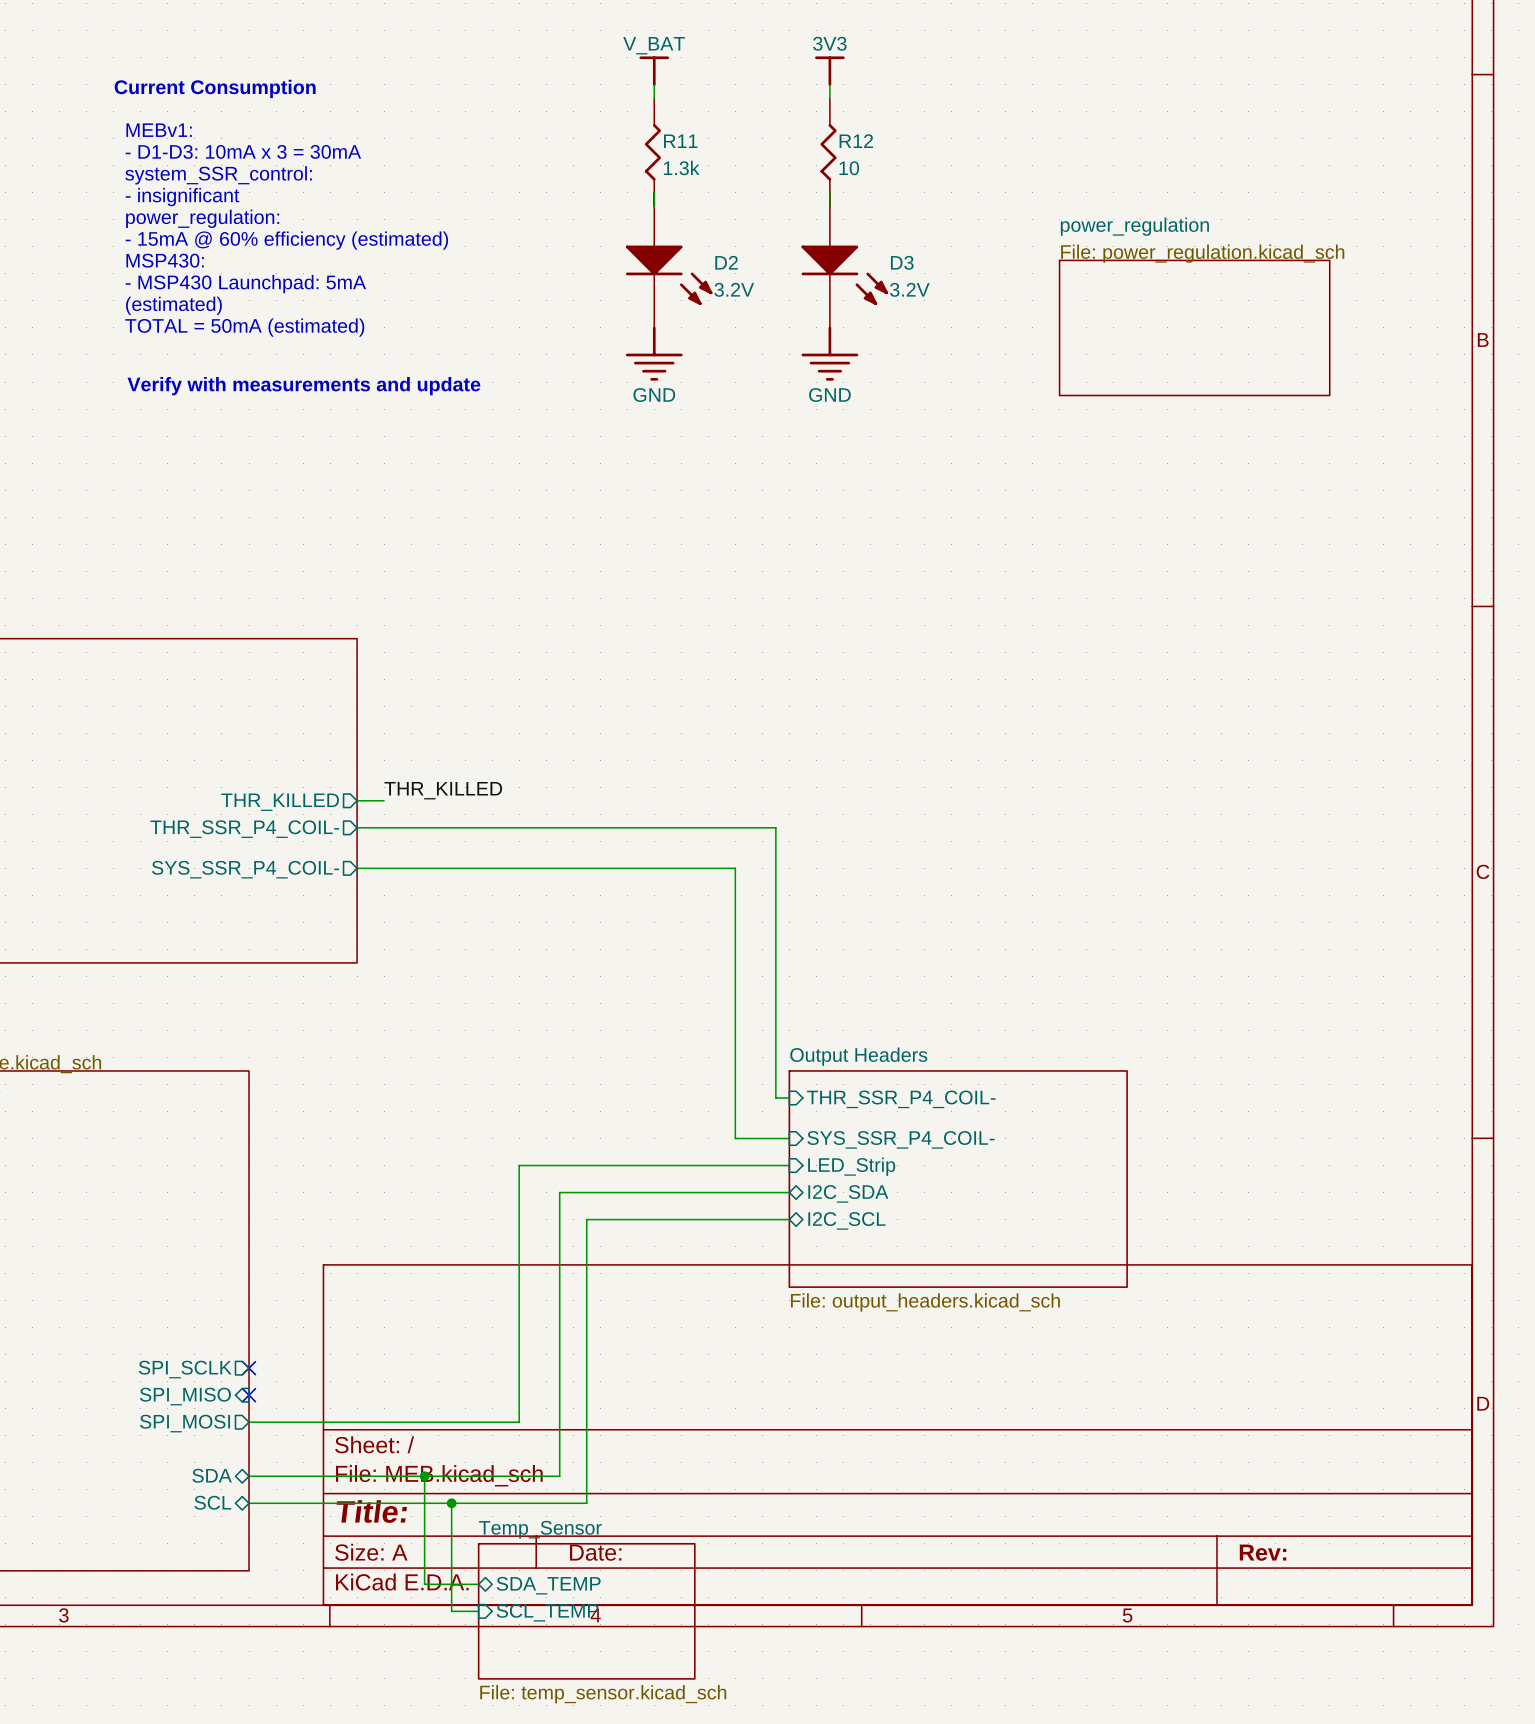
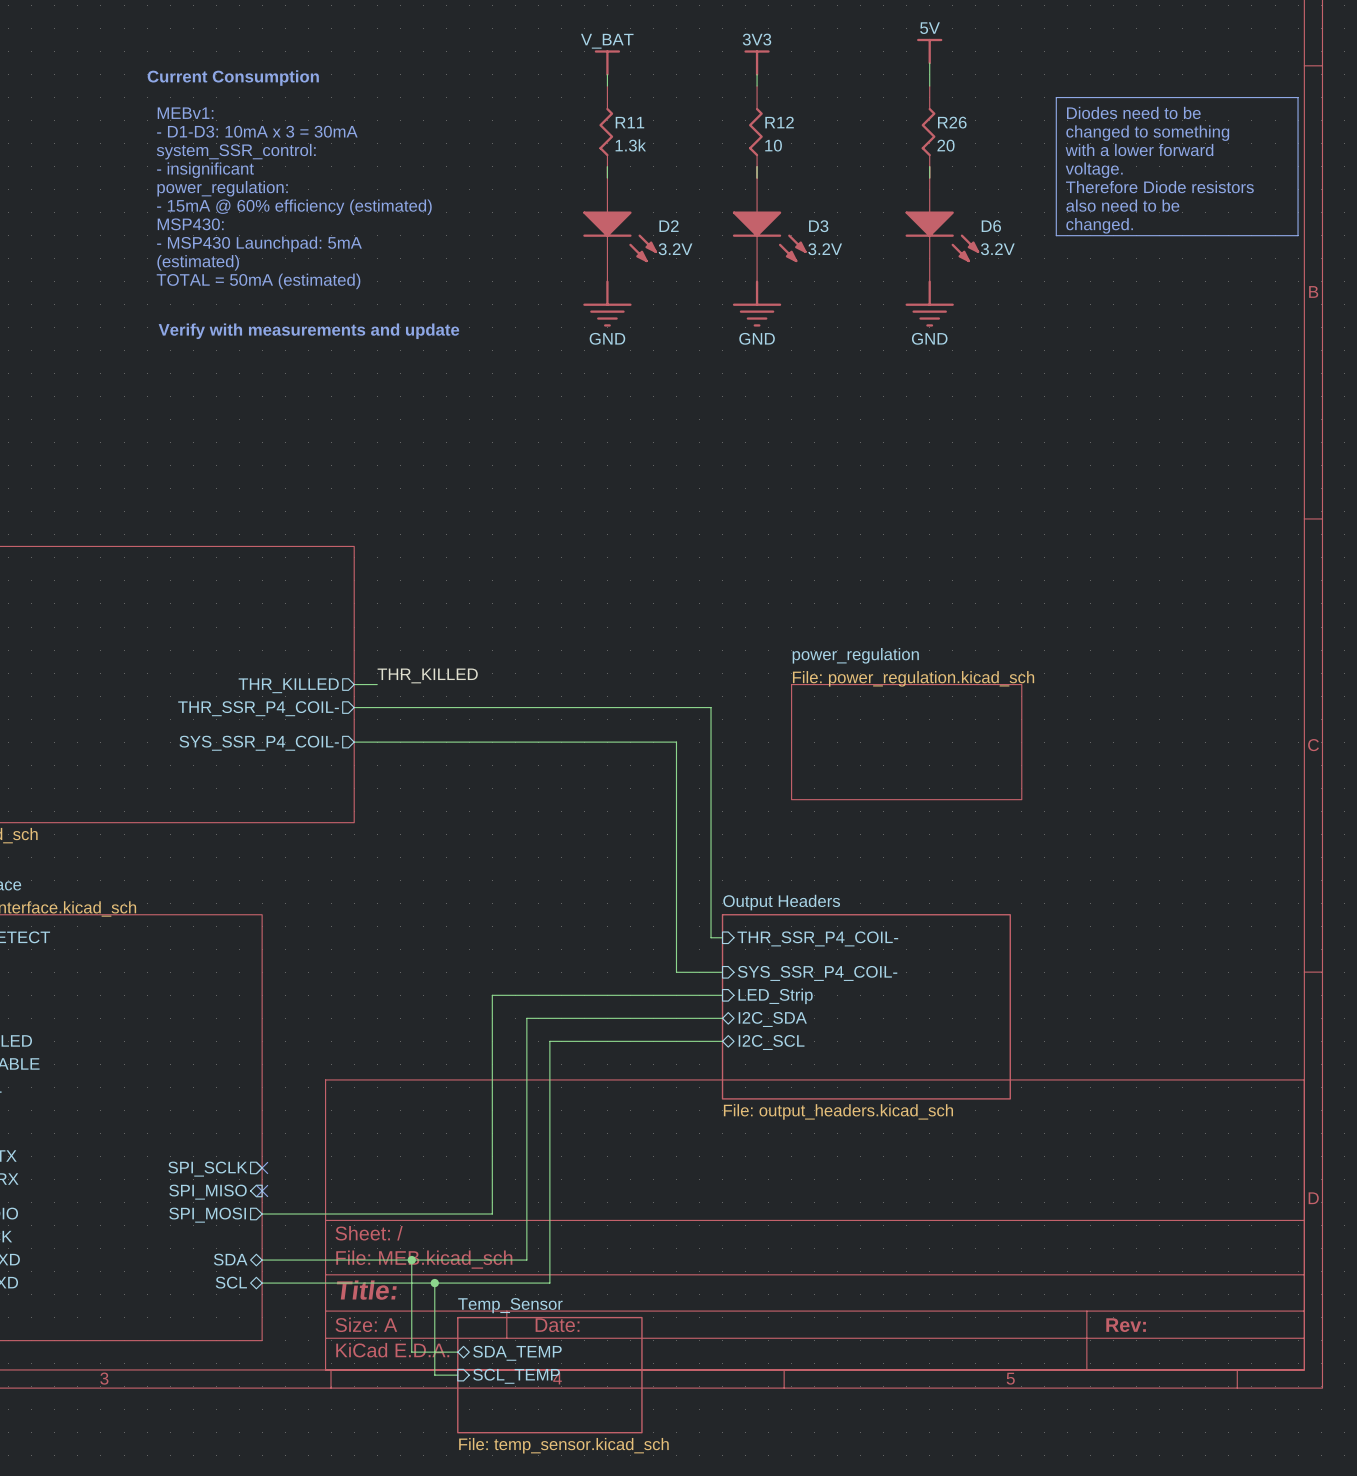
power symbol: none -> 5V (929, 51)
wire: none -> (929, 63) (929, 86)
line: none -> (1056, 97) (1298, 97) (1298, 235) (1056, 235) (1056, 97)
text: none -> Diodes need to be (1133, 112)
R26: none -> 20 (928, 132)
text: none -> changed to something (1147, 133)
text: none -> with a lower forward (1139, 150)
wire: none -> (929, 166) (929, 178)
text: none -> voltage. (1094, 170)
text: none -> Therefore Diode resistors (1159, 187)
text: none -> also need to be (1122, 205)
D6: none -> 3.2V (942, 224)
text: none -> changed. (1099, 225)
sheet power_regulation: File: power_regulation.kicad_sch (1194, 327) -> none
power symbol: none -> GND (929, 303)
sheet power_regulation: none -> File: power_regulation.kicad_sch (906, 742)

